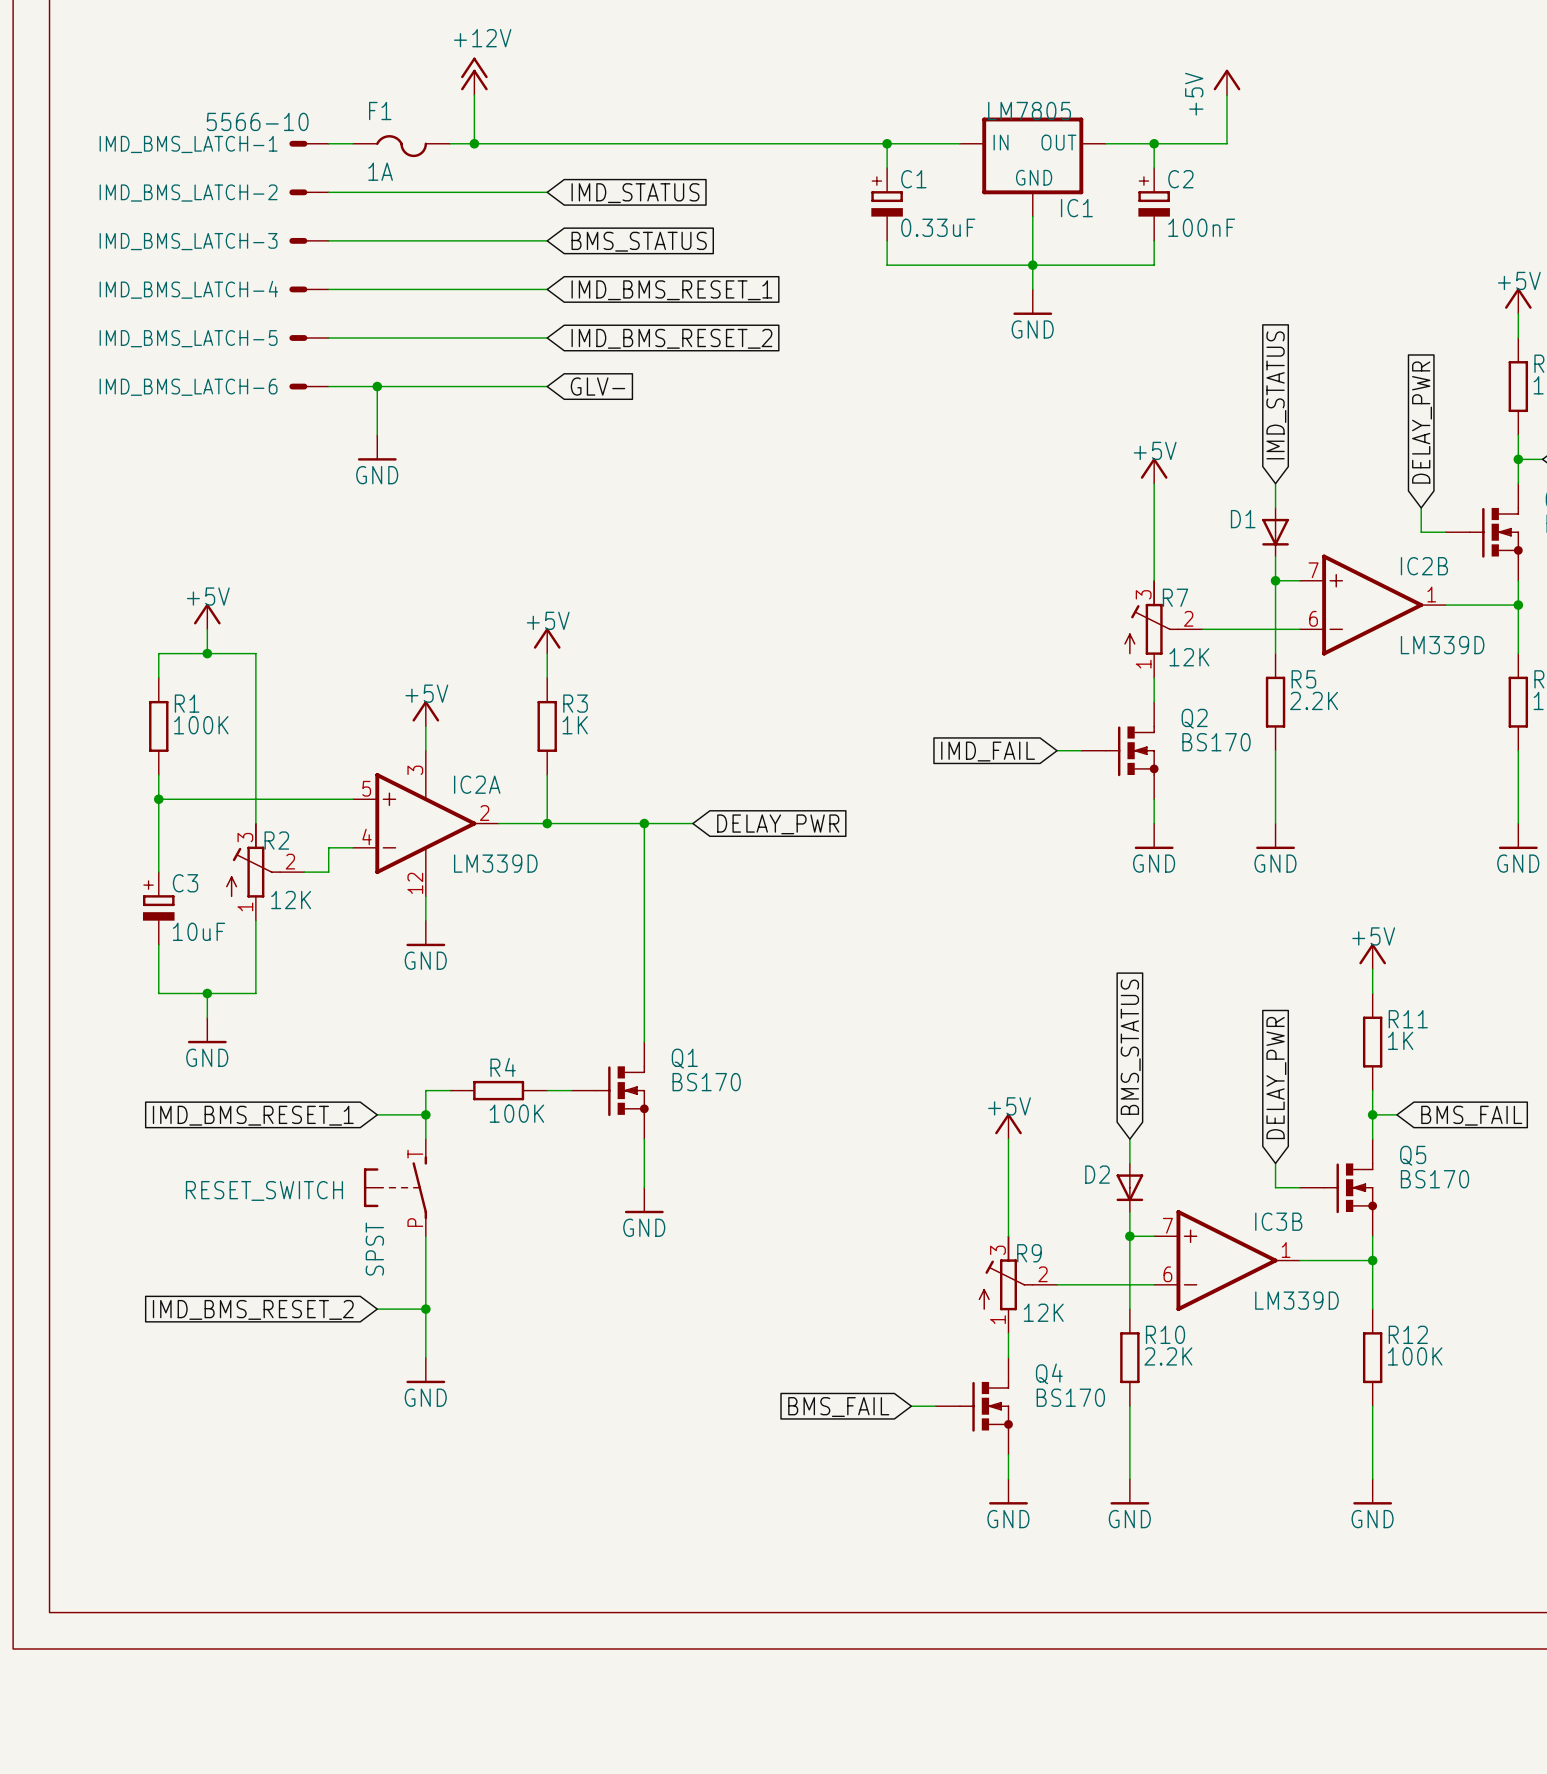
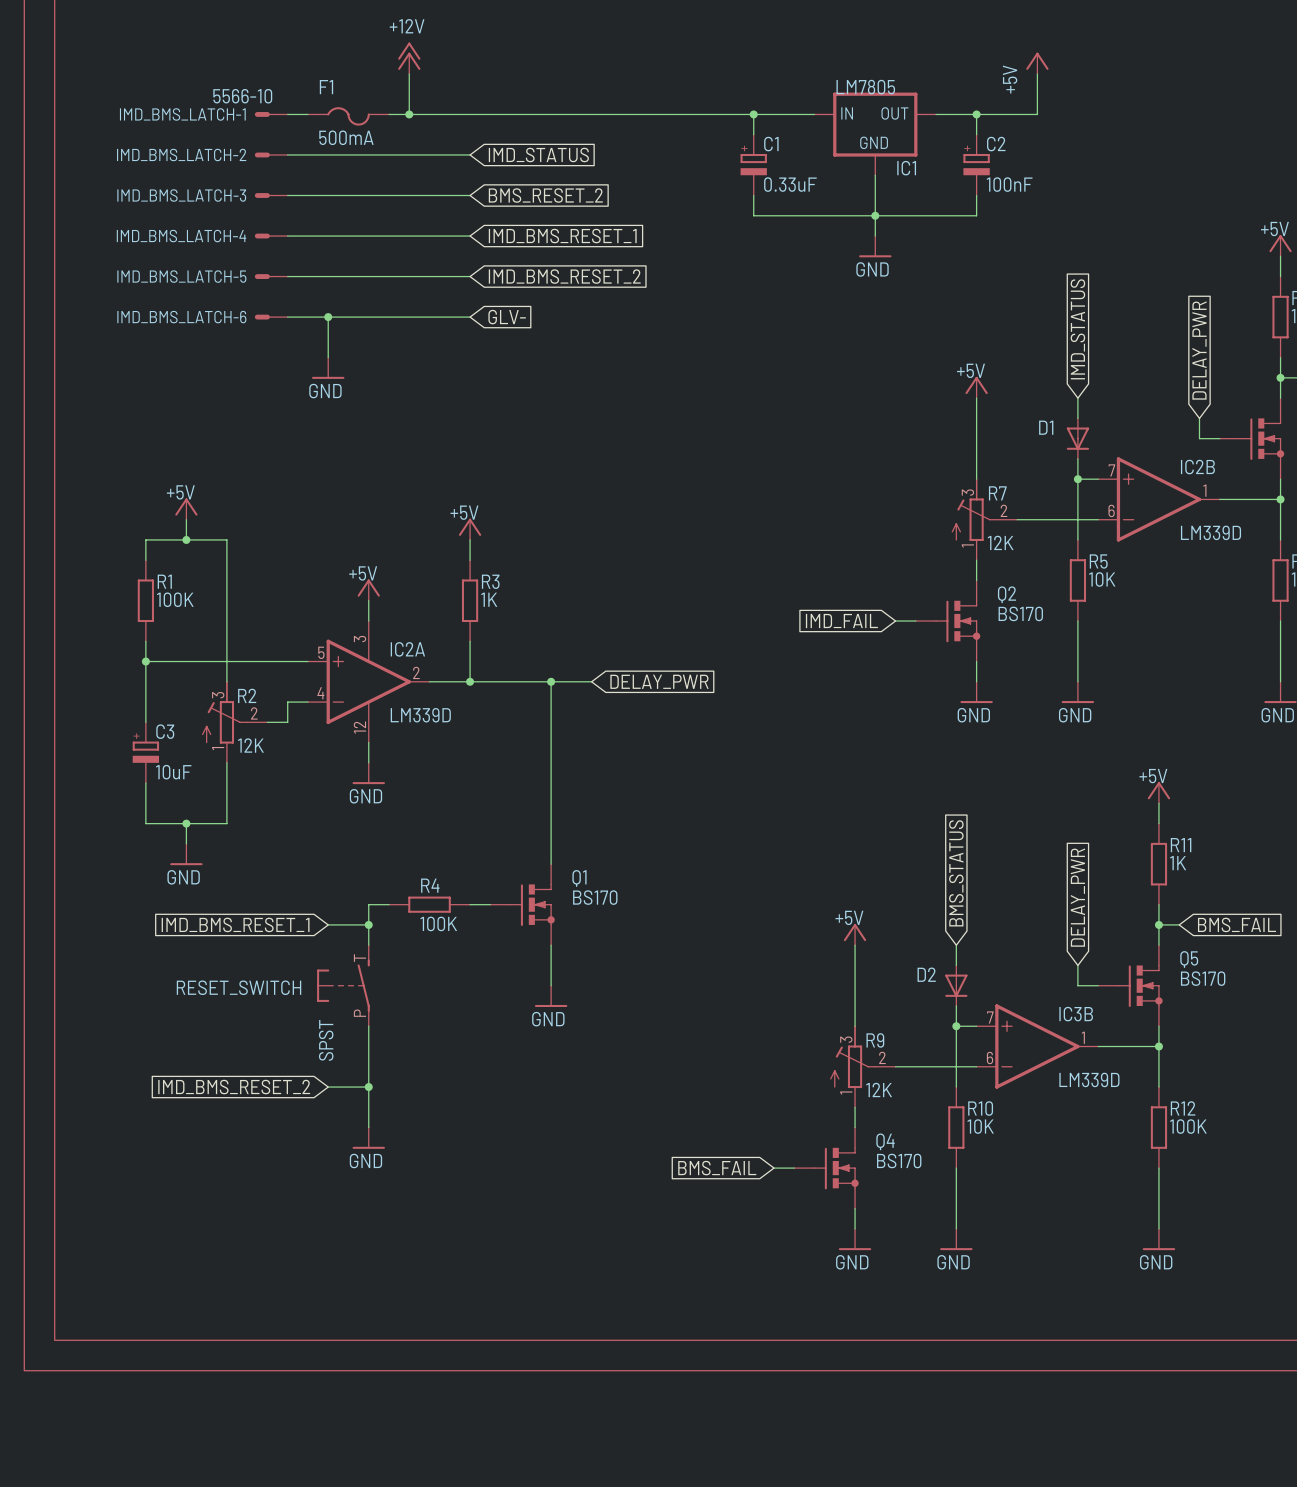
F1 value: 1A (380, 171) -> 500mA (346, 137)
global label: BMS_STATUS (639, 241) -> BMS_RESET_2 (545, 195)
R5 value: 2.2K (1314, 700) -> 10K (1102, 579)
R10 value: 2.2K (1168, 1356) -> 10K (980, 1126)

